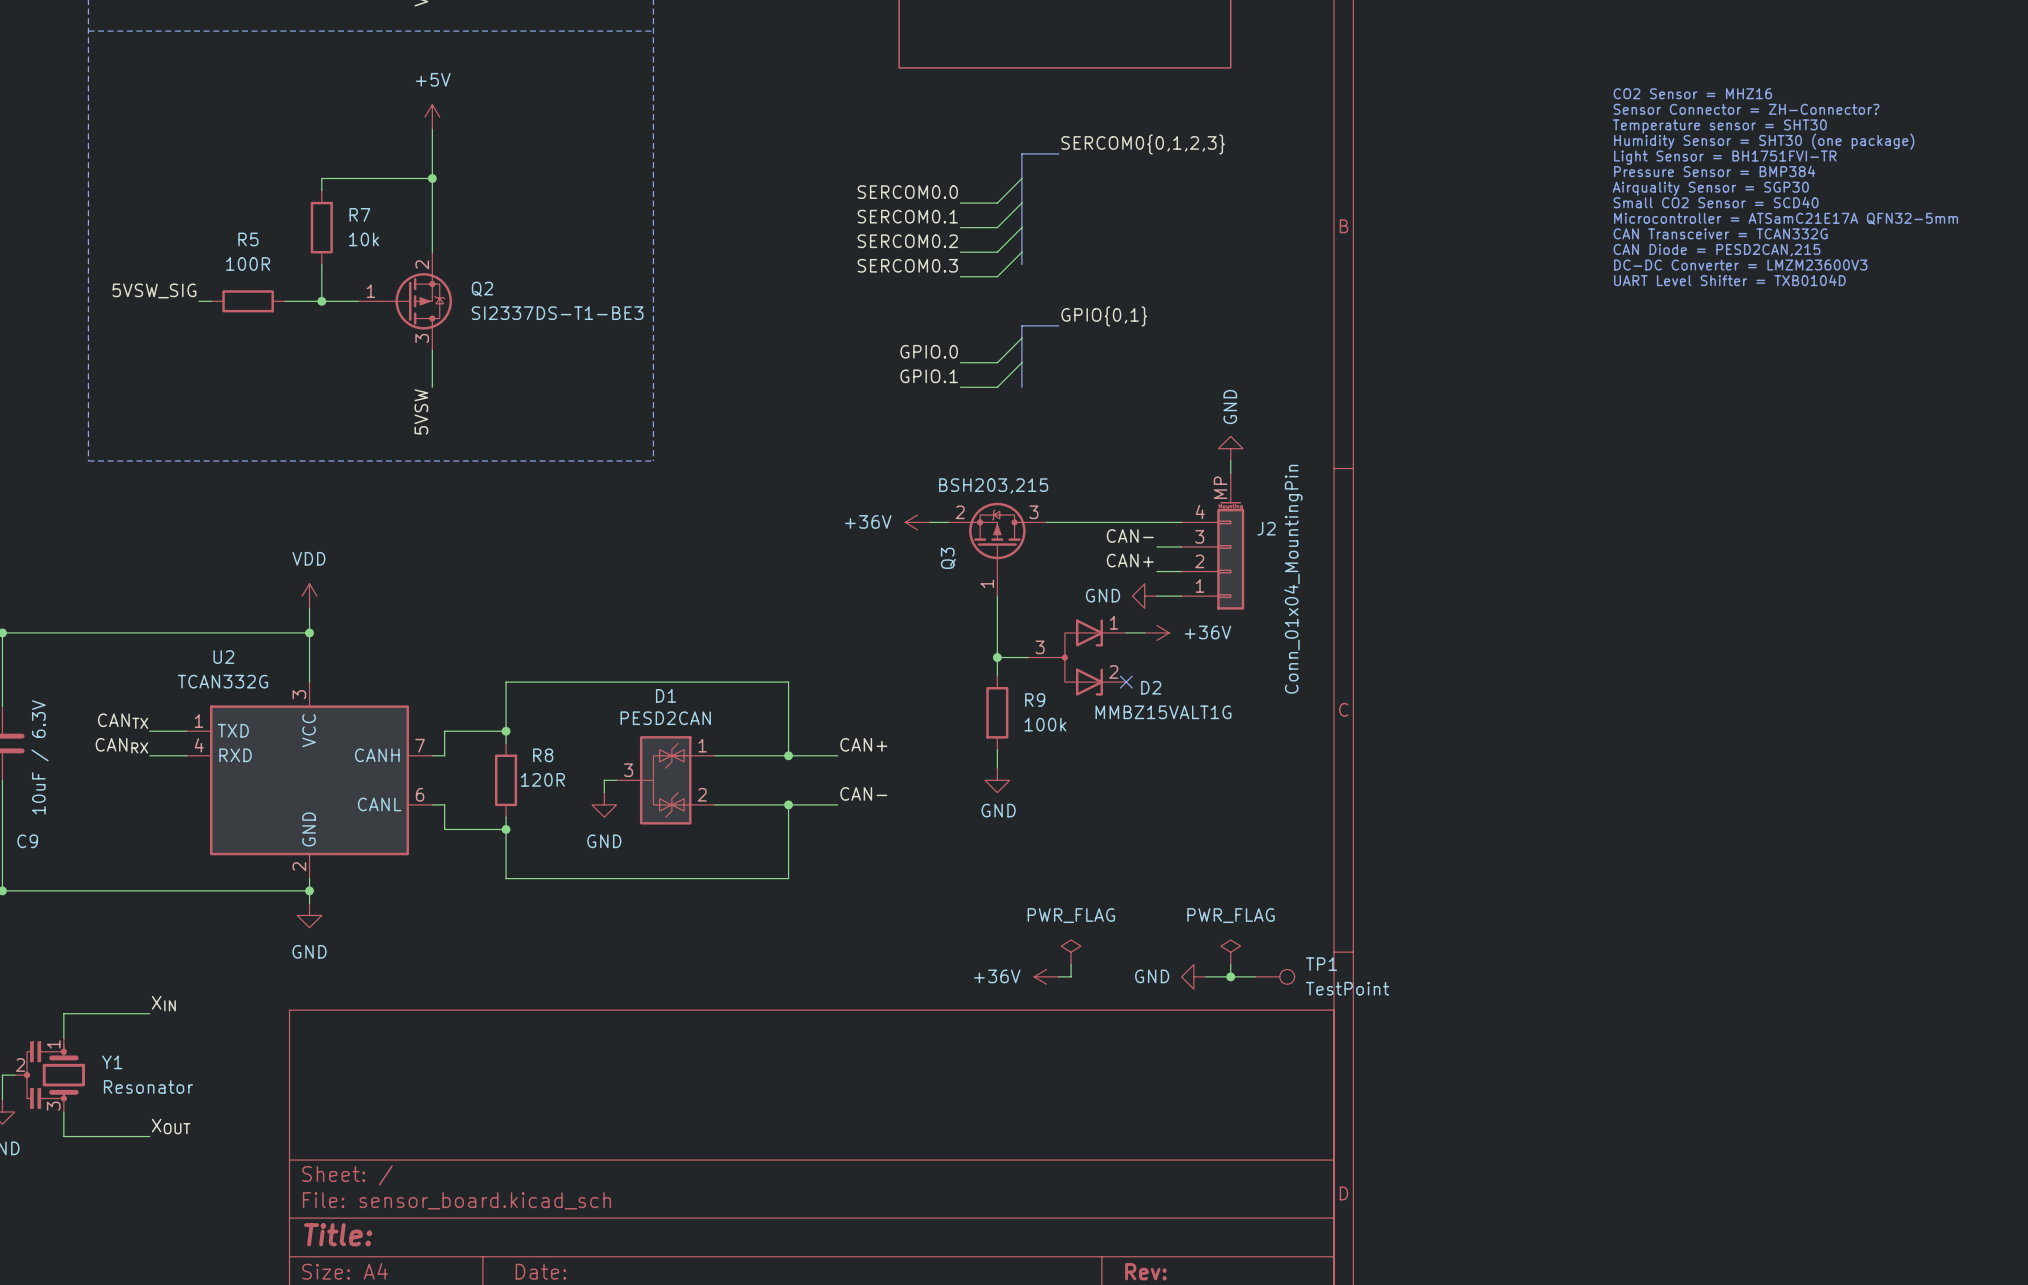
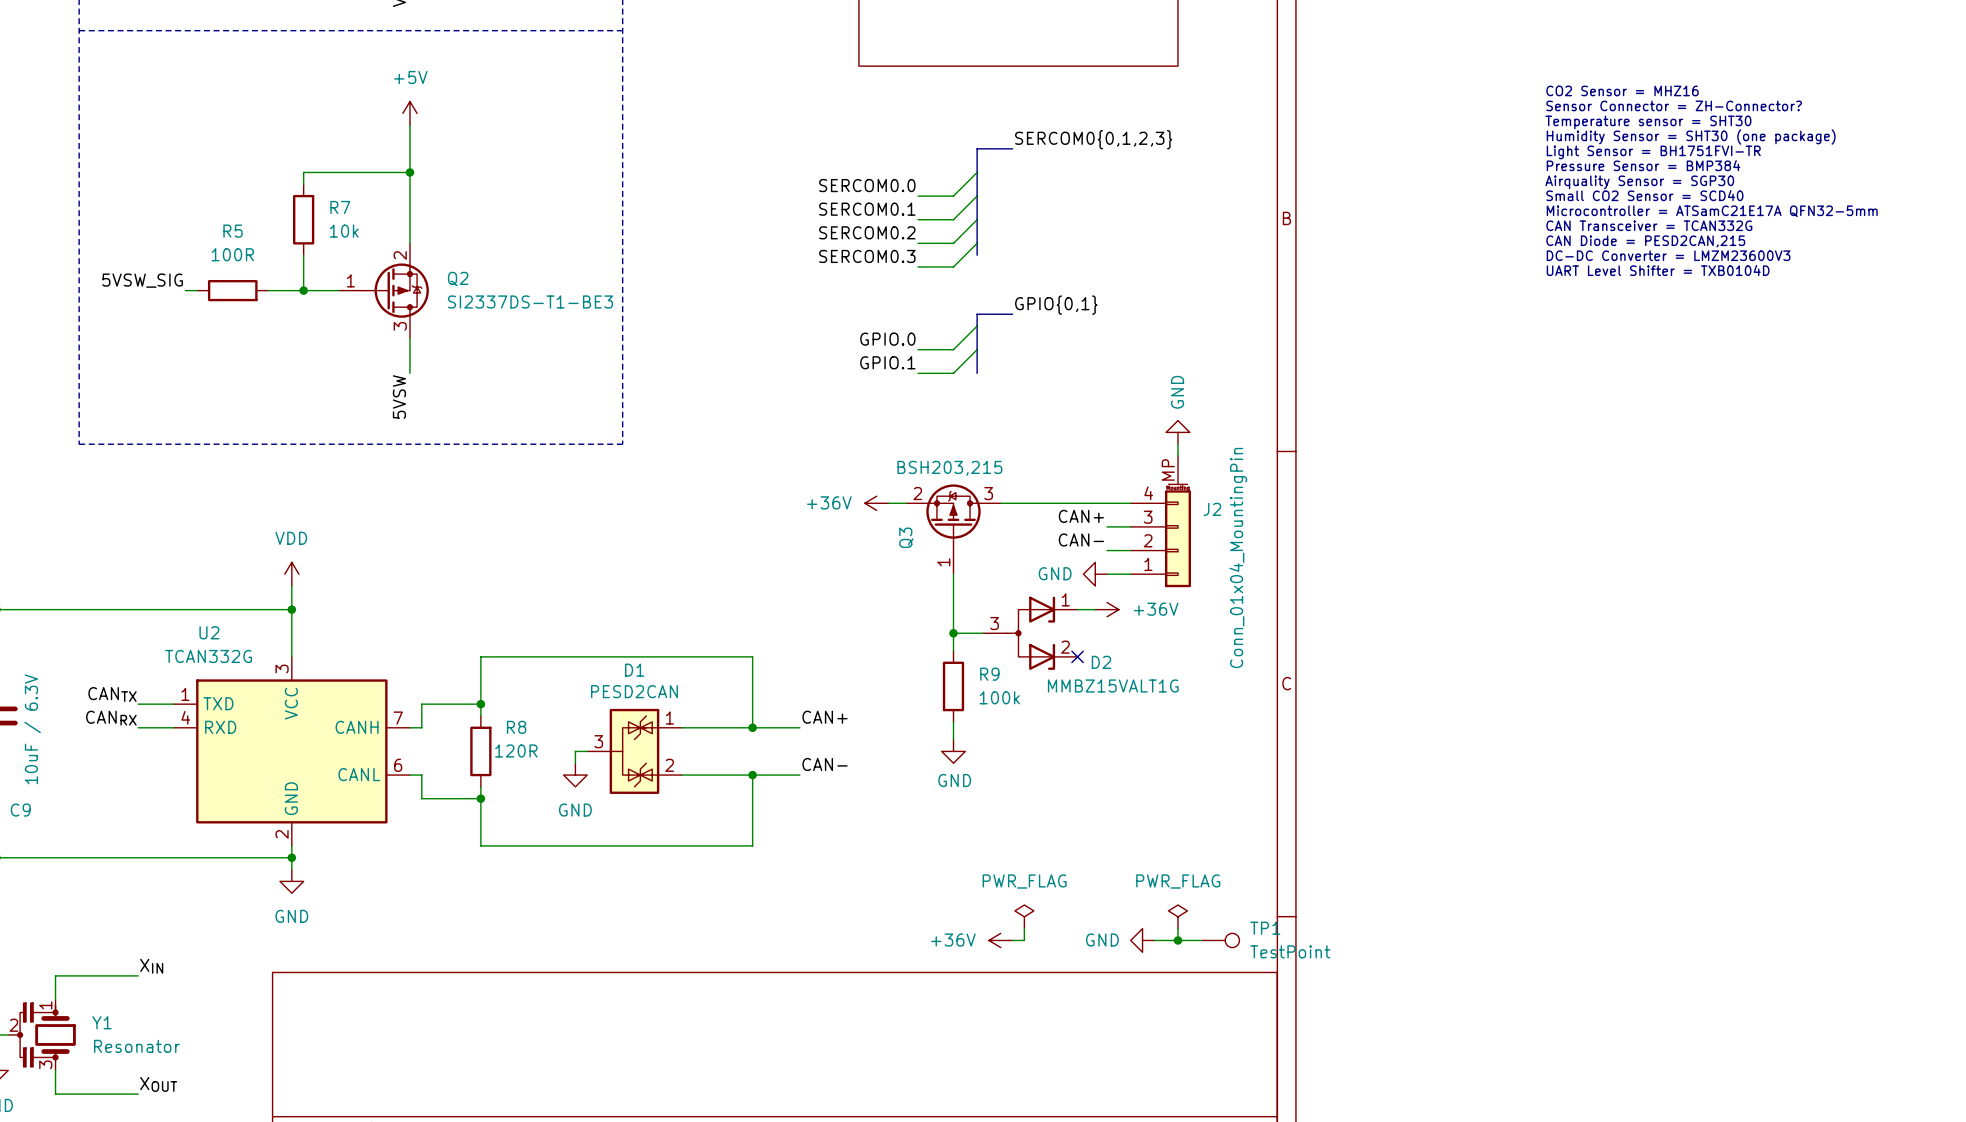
label: CAN- (1130, 536) -> CAN+ (1081, 516)
label: CAN+ (1130, 560) -> CAN- (1081, 540)

